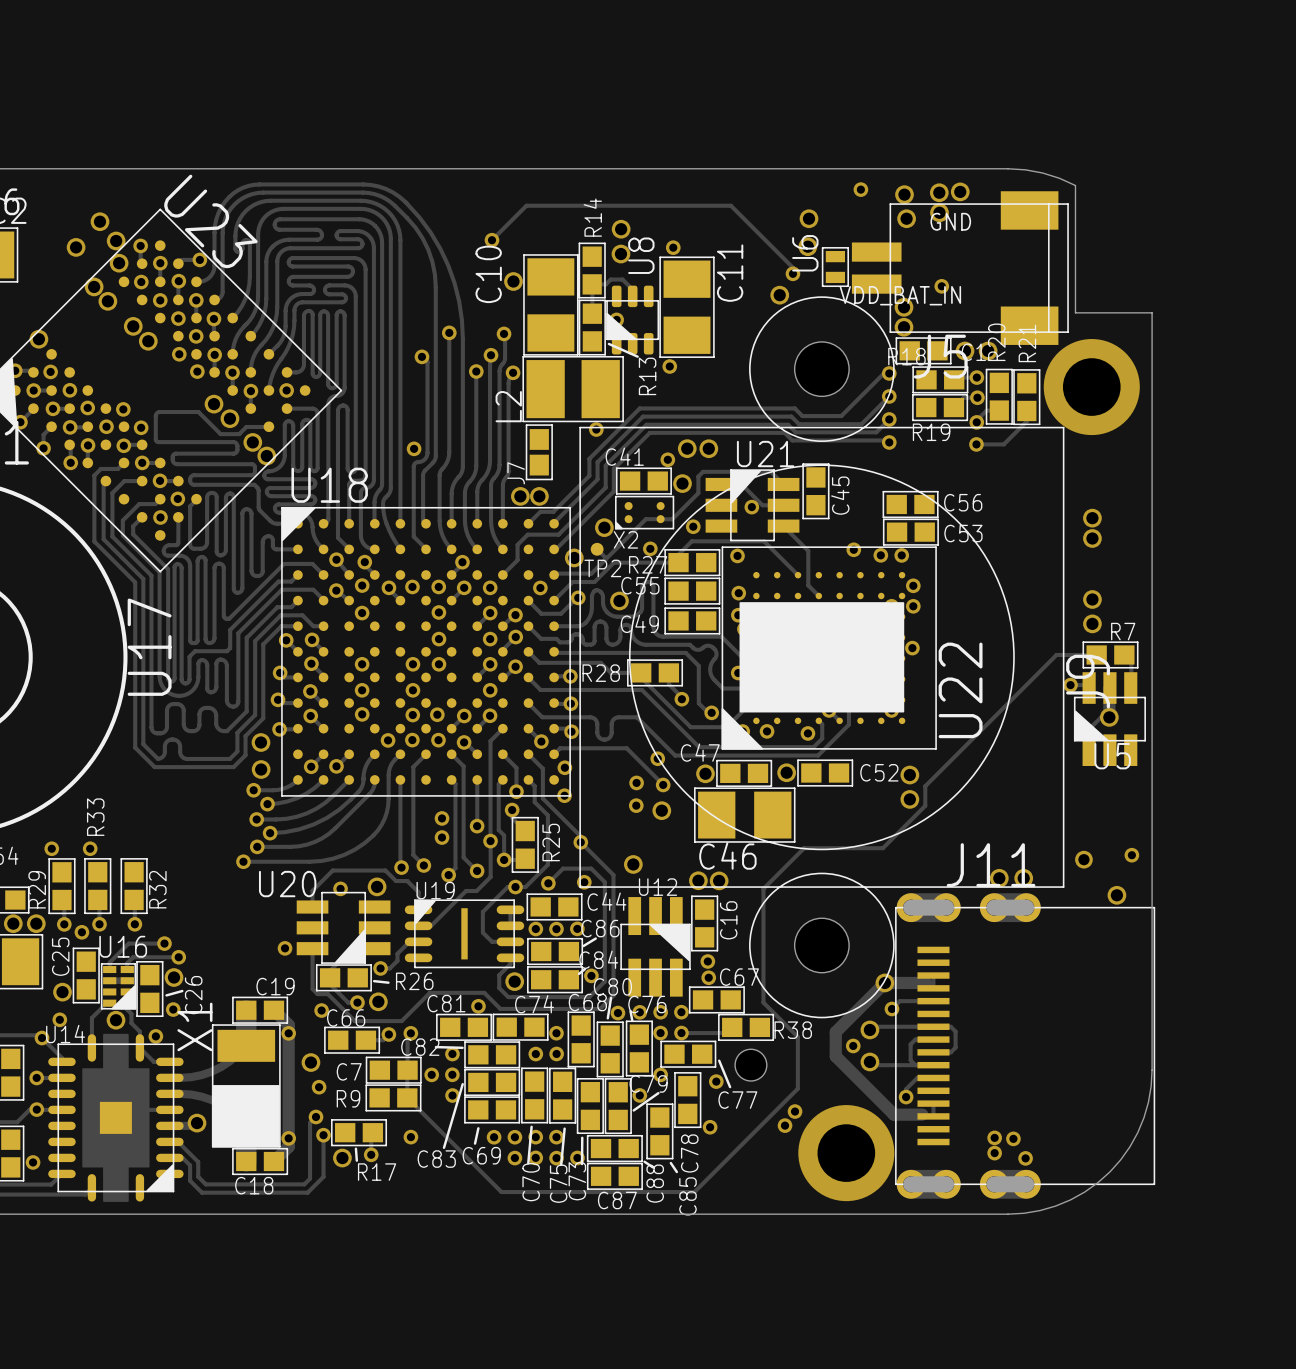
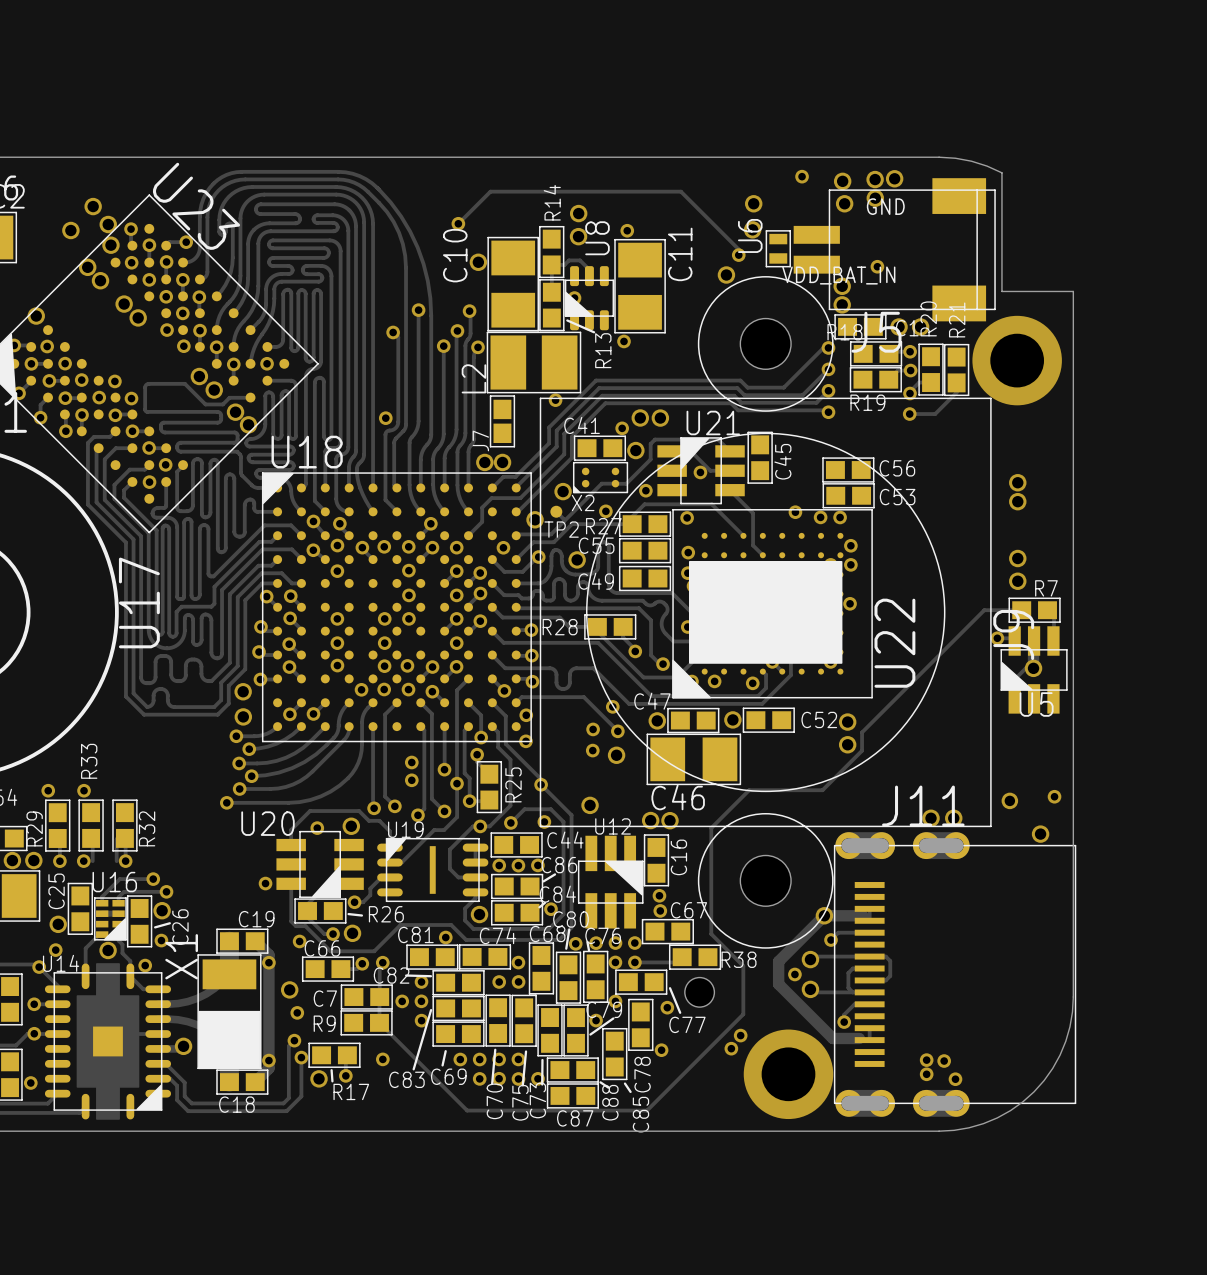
track: none -> (117, 838) (116, 861)
via: none -> (83, 861)
via: (99, 924) -> none
via: (81, 932) -> none

